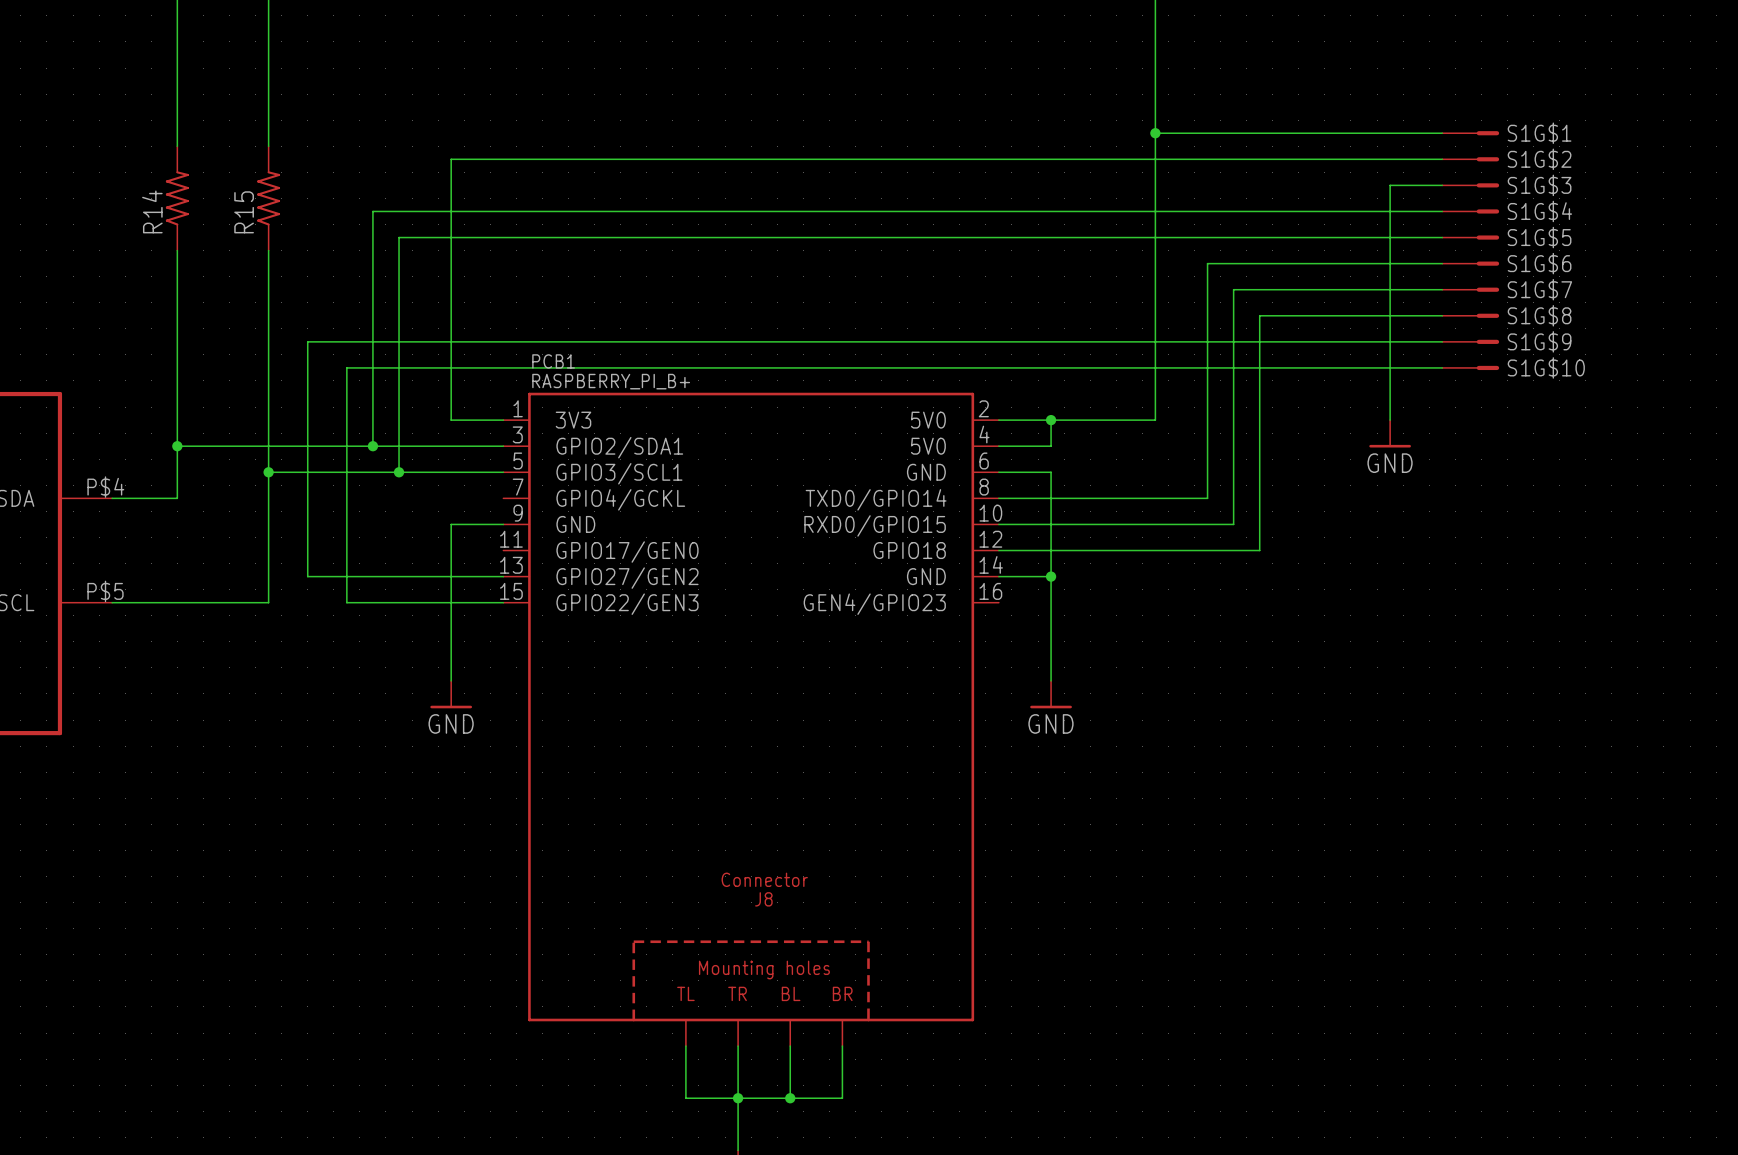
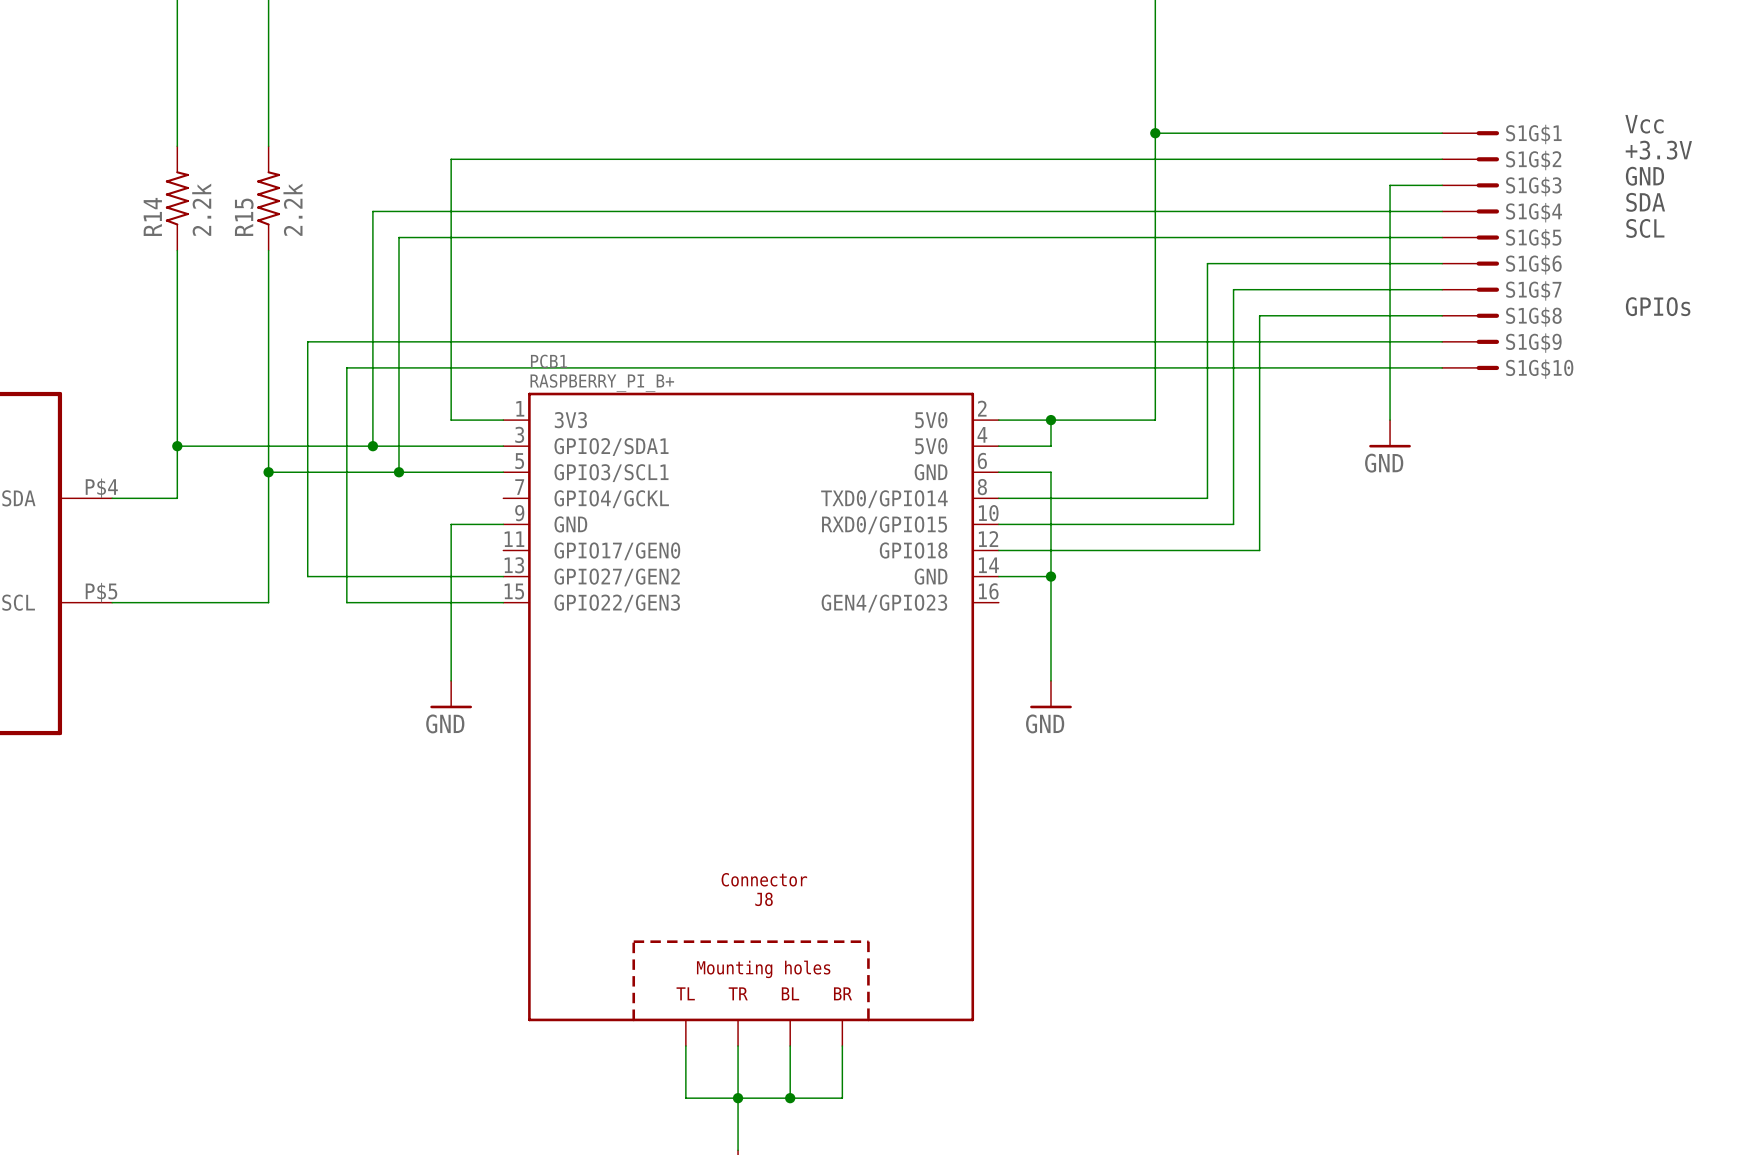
text: none -> Vcc (1644, 124)
text: none -> +3.3V (1658, 150)
text: none -> GND (1644, 176)
text: none -> SDA (1645, 202)
R14 value: none -> 2.2k (201, 209)
R15 value: none -> 2.2k (292, 209)
text: none -> SCL (1645, 228)
text: none -> GPIOs (1658, 306)

